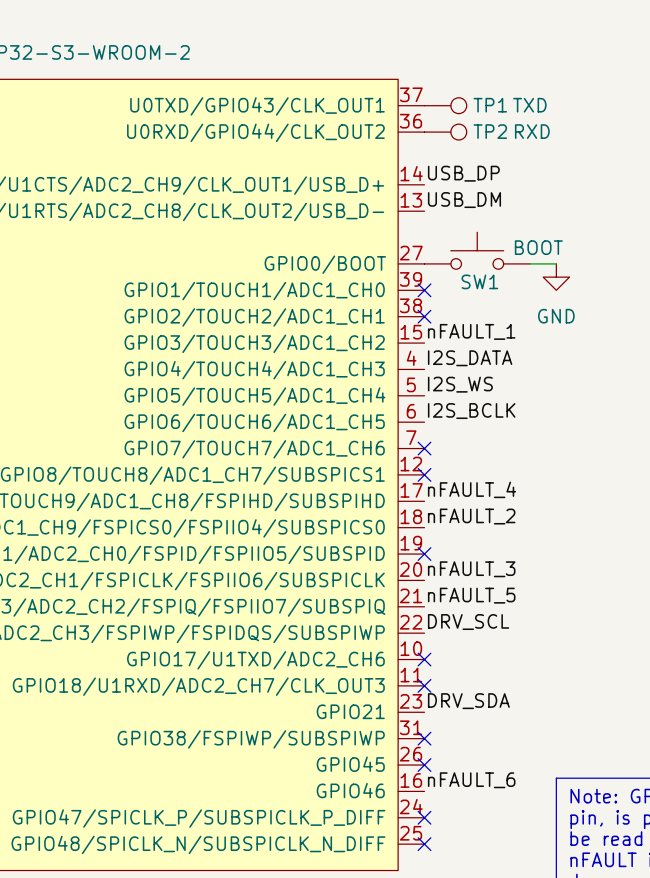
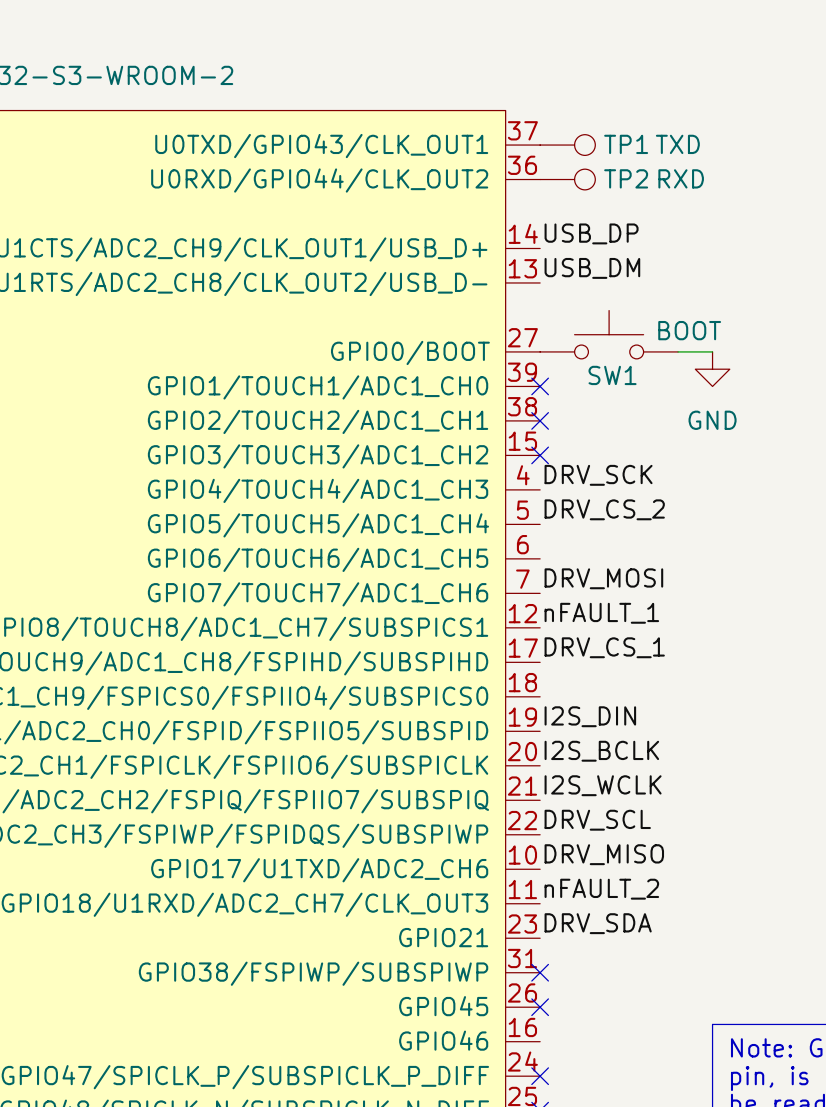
label position: nFAULT_1 (471, 331) -> nFAULT_1 (601, 613)
no-connect mark: none -> (540, 455)
label: I2S_DATA (470, 358) -> DRV_SCK (598, 475)
label: I2S_WS (460, 384) -> DRV_CS_2 (604, 509)
label: I2S_BCLK (471, 411) -> none
label: none -> DRV_MOSI (603, 578)
no-connect mark: (424, 448) -> none
no-connect mark: (424, 474) -> none
label: nFAULT_4 (472, 489) -> DRV_CS_1 (604, 647)
label position: nFAULT_2 (471, 516) -> nFAULT_2 (601, 889)
label: none -> I2S_DIN (590, 716)
no-connect mark: (424, 554) -> none
label: nFAULT_3 (471, 569) -> I2S_BCLK (601, 751)
label: nFAULT_5 (471, 595) -> I2S_WCLK (603, 785)
label: none -> DRV_MISO (604, 854)
no-connect mark: (424, 659) -> none
no-connect mark: (424, 685) -> none
label: nFAULT_6 (471, 780) -> none

